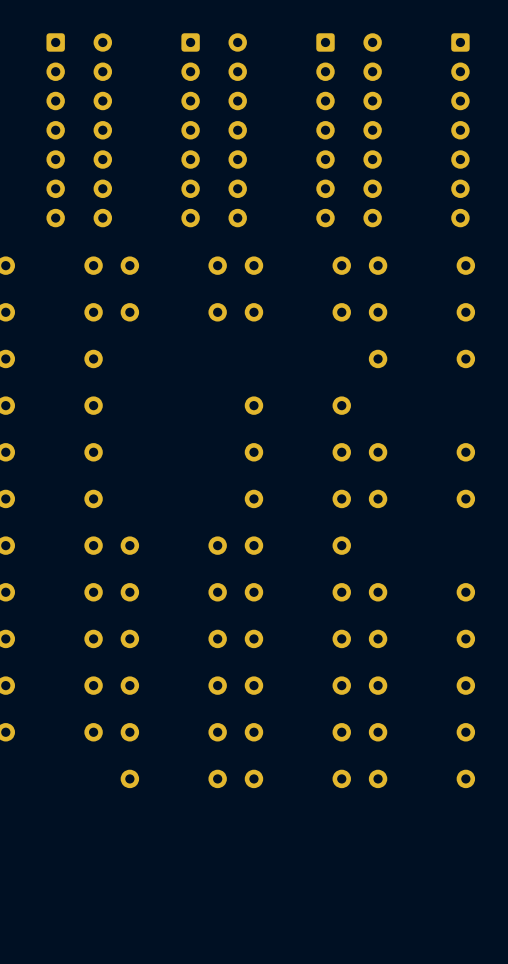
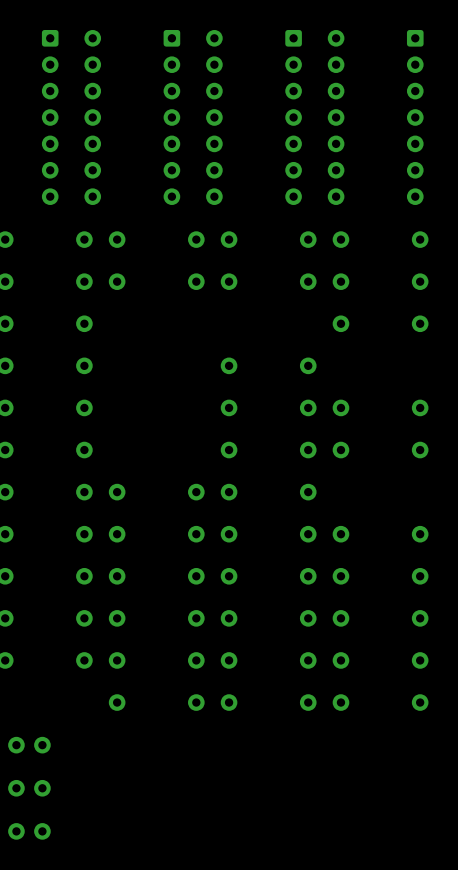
part: none -> (29, 745)
part: none -> (29, 788)
part: none -> (29, 831)

